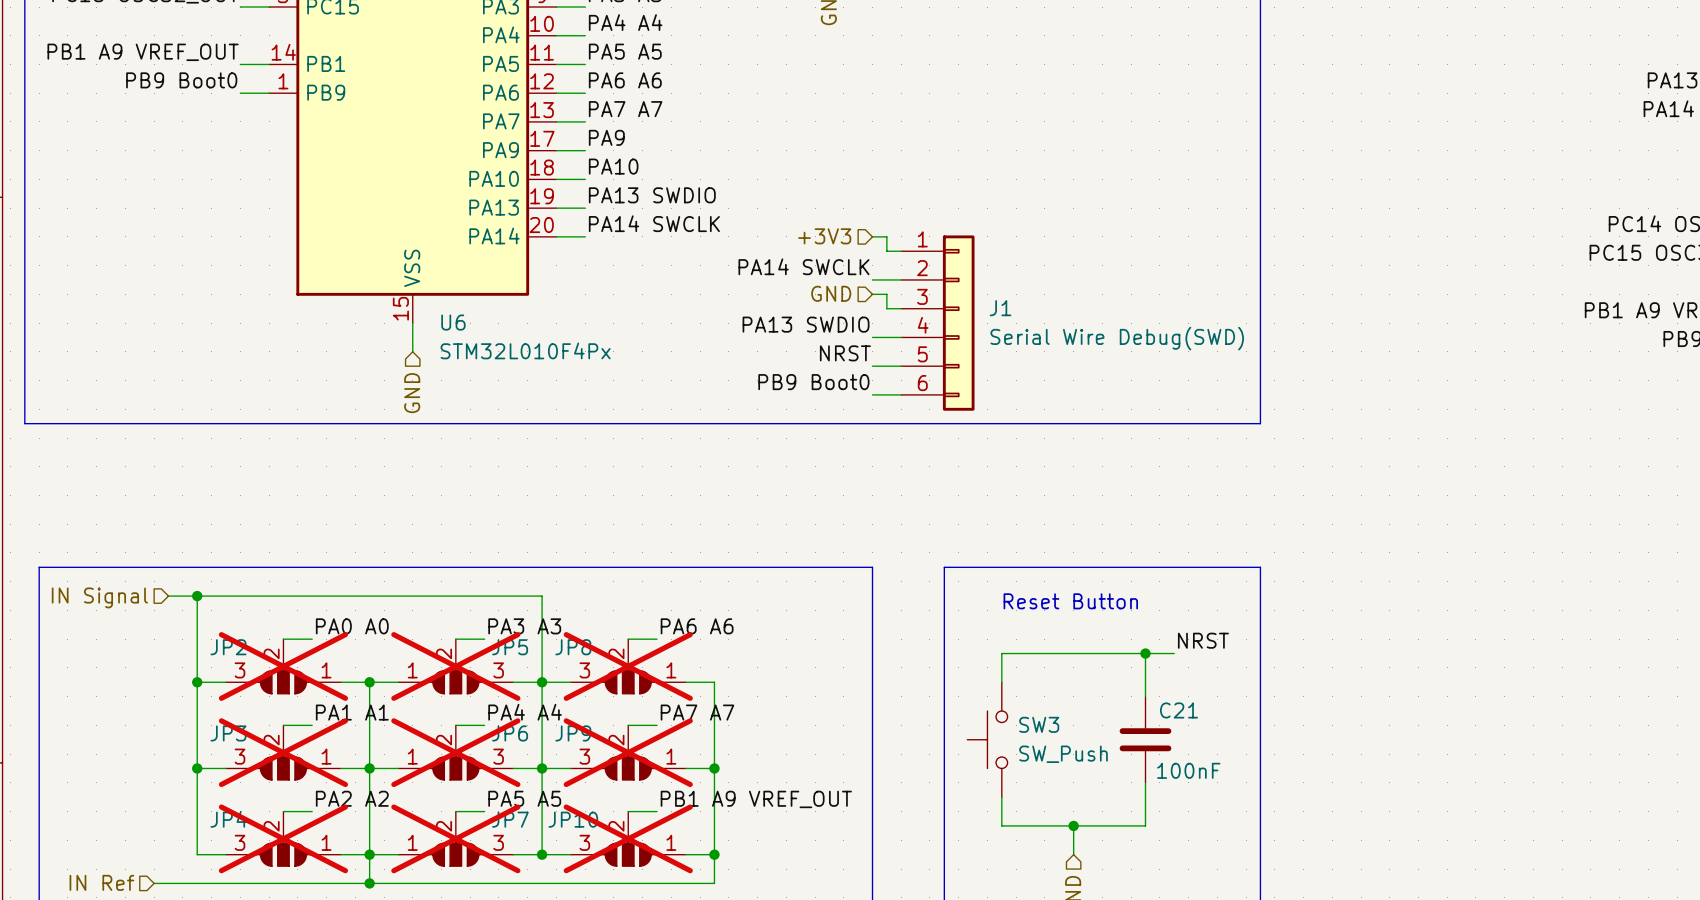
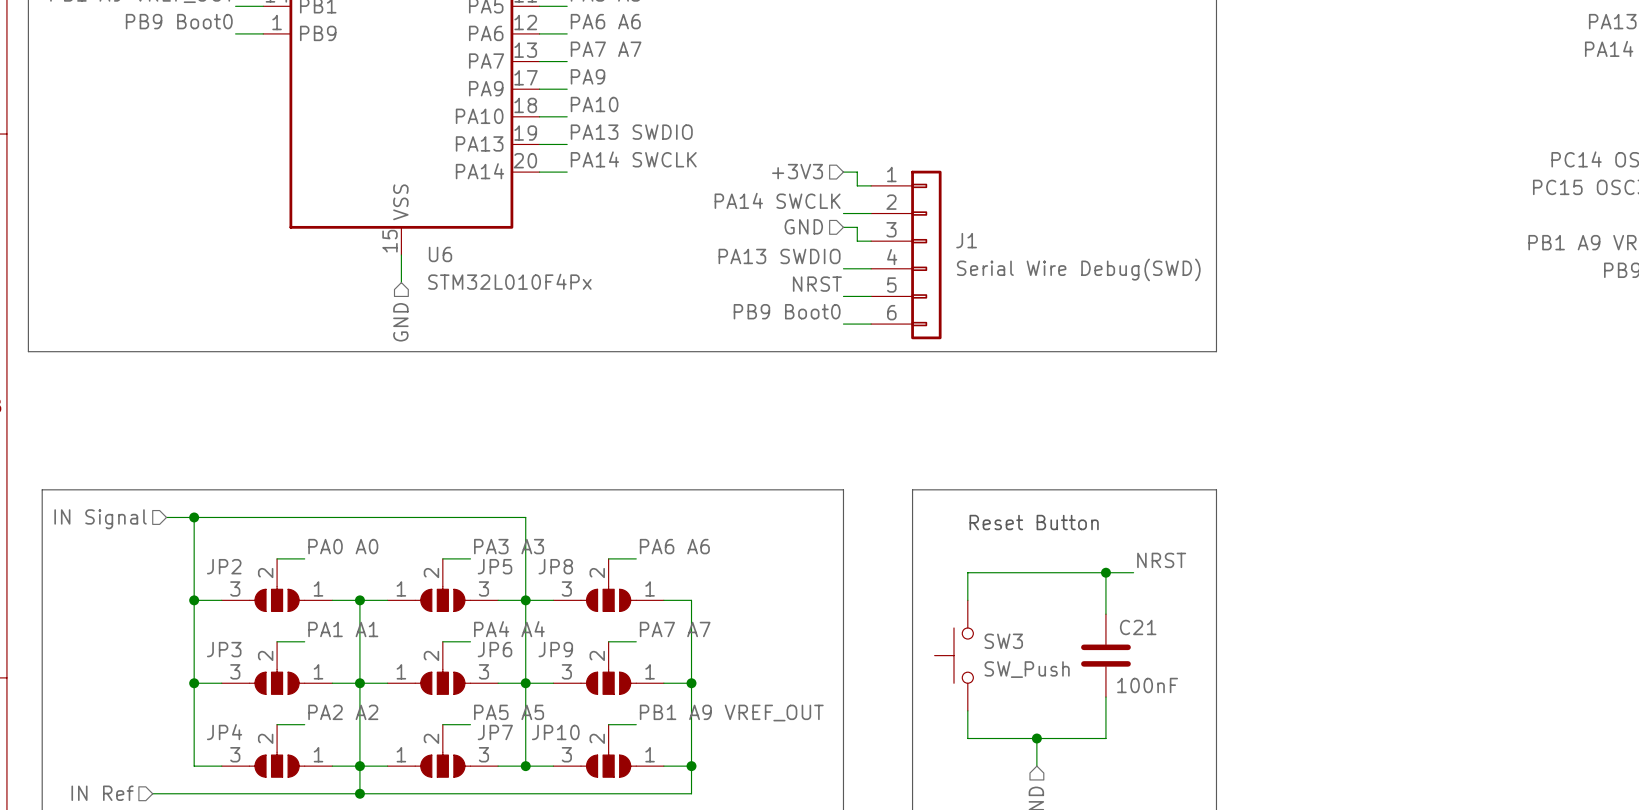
JP2 do-not-place cross: (283, 666) -> none
JP5 do-not-place cross: (455, 666) -> none
JP8 do-not-place cross: (628, 666) -> none
JP3 do-not-place cross: (283, 752) -> none
JP6 do-not-place cross: (455, 752) -> none
JP9 do-not-place cross: (628, 752) -> none
JP4 do-not-place cross: (283, 838) -> none
JP7 do-not-place cross: (455, 838) -> none
JP10 do-not-place cross: (628, 838) -> none

